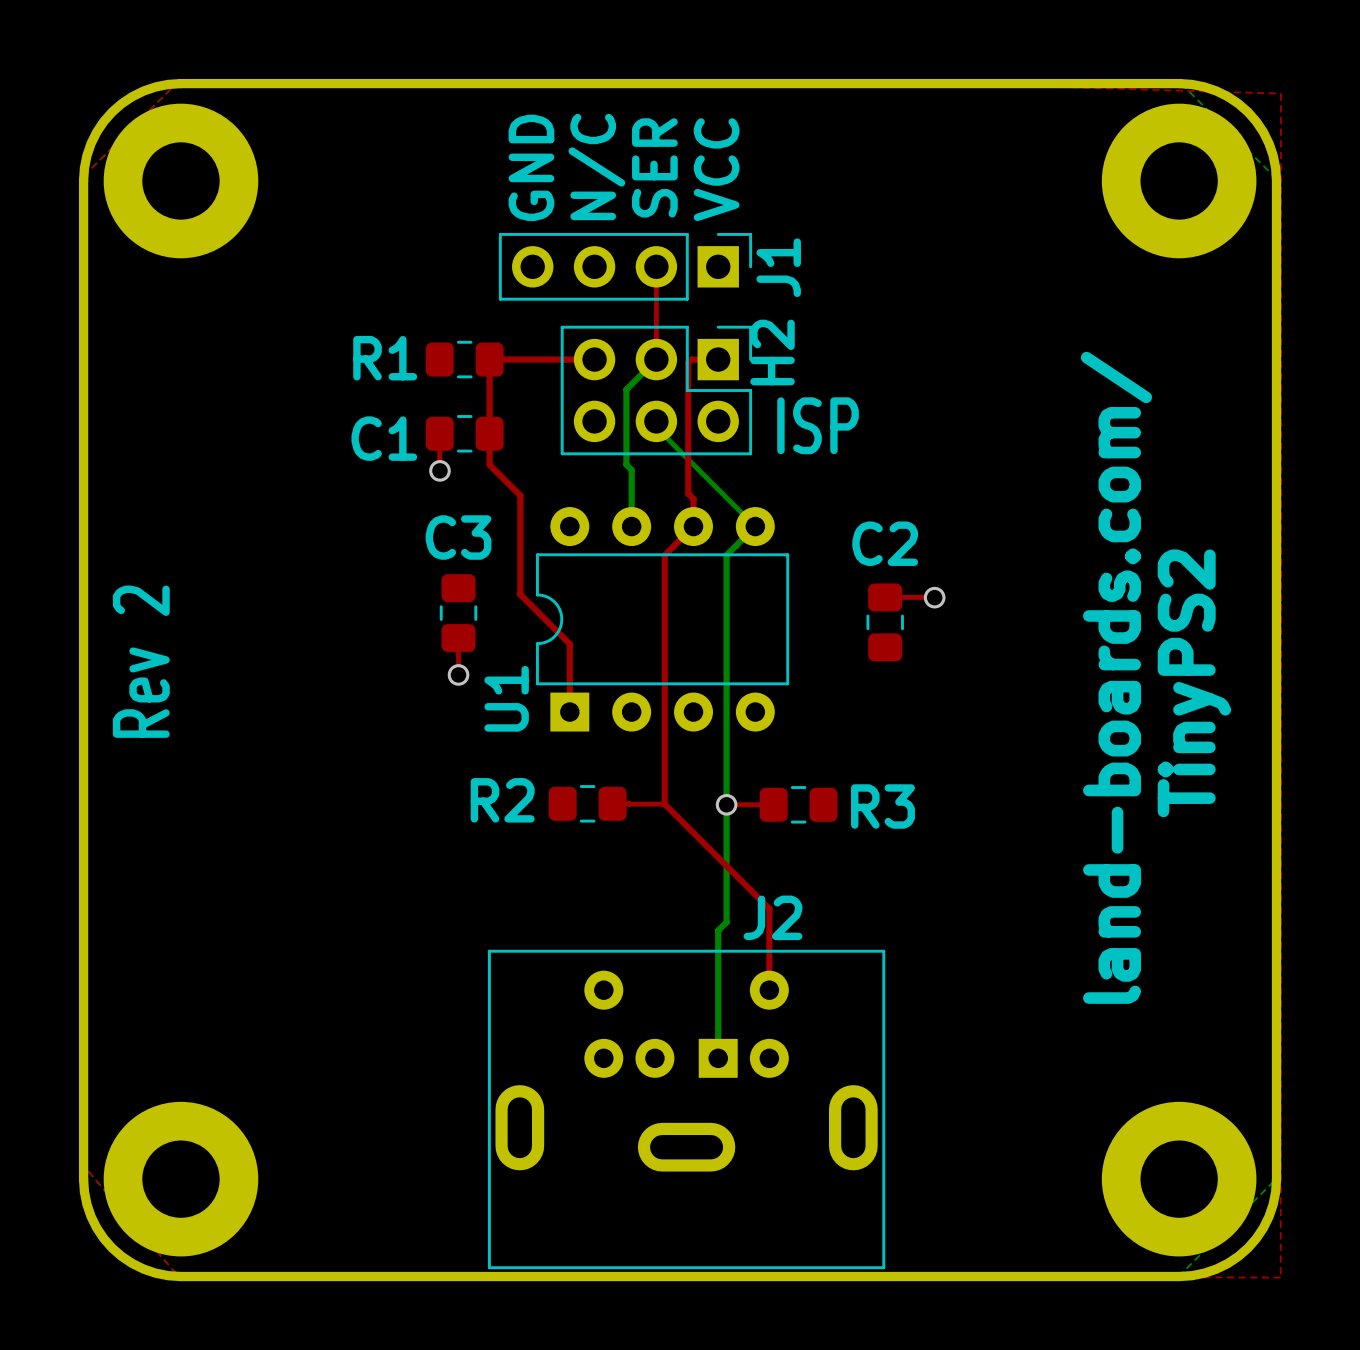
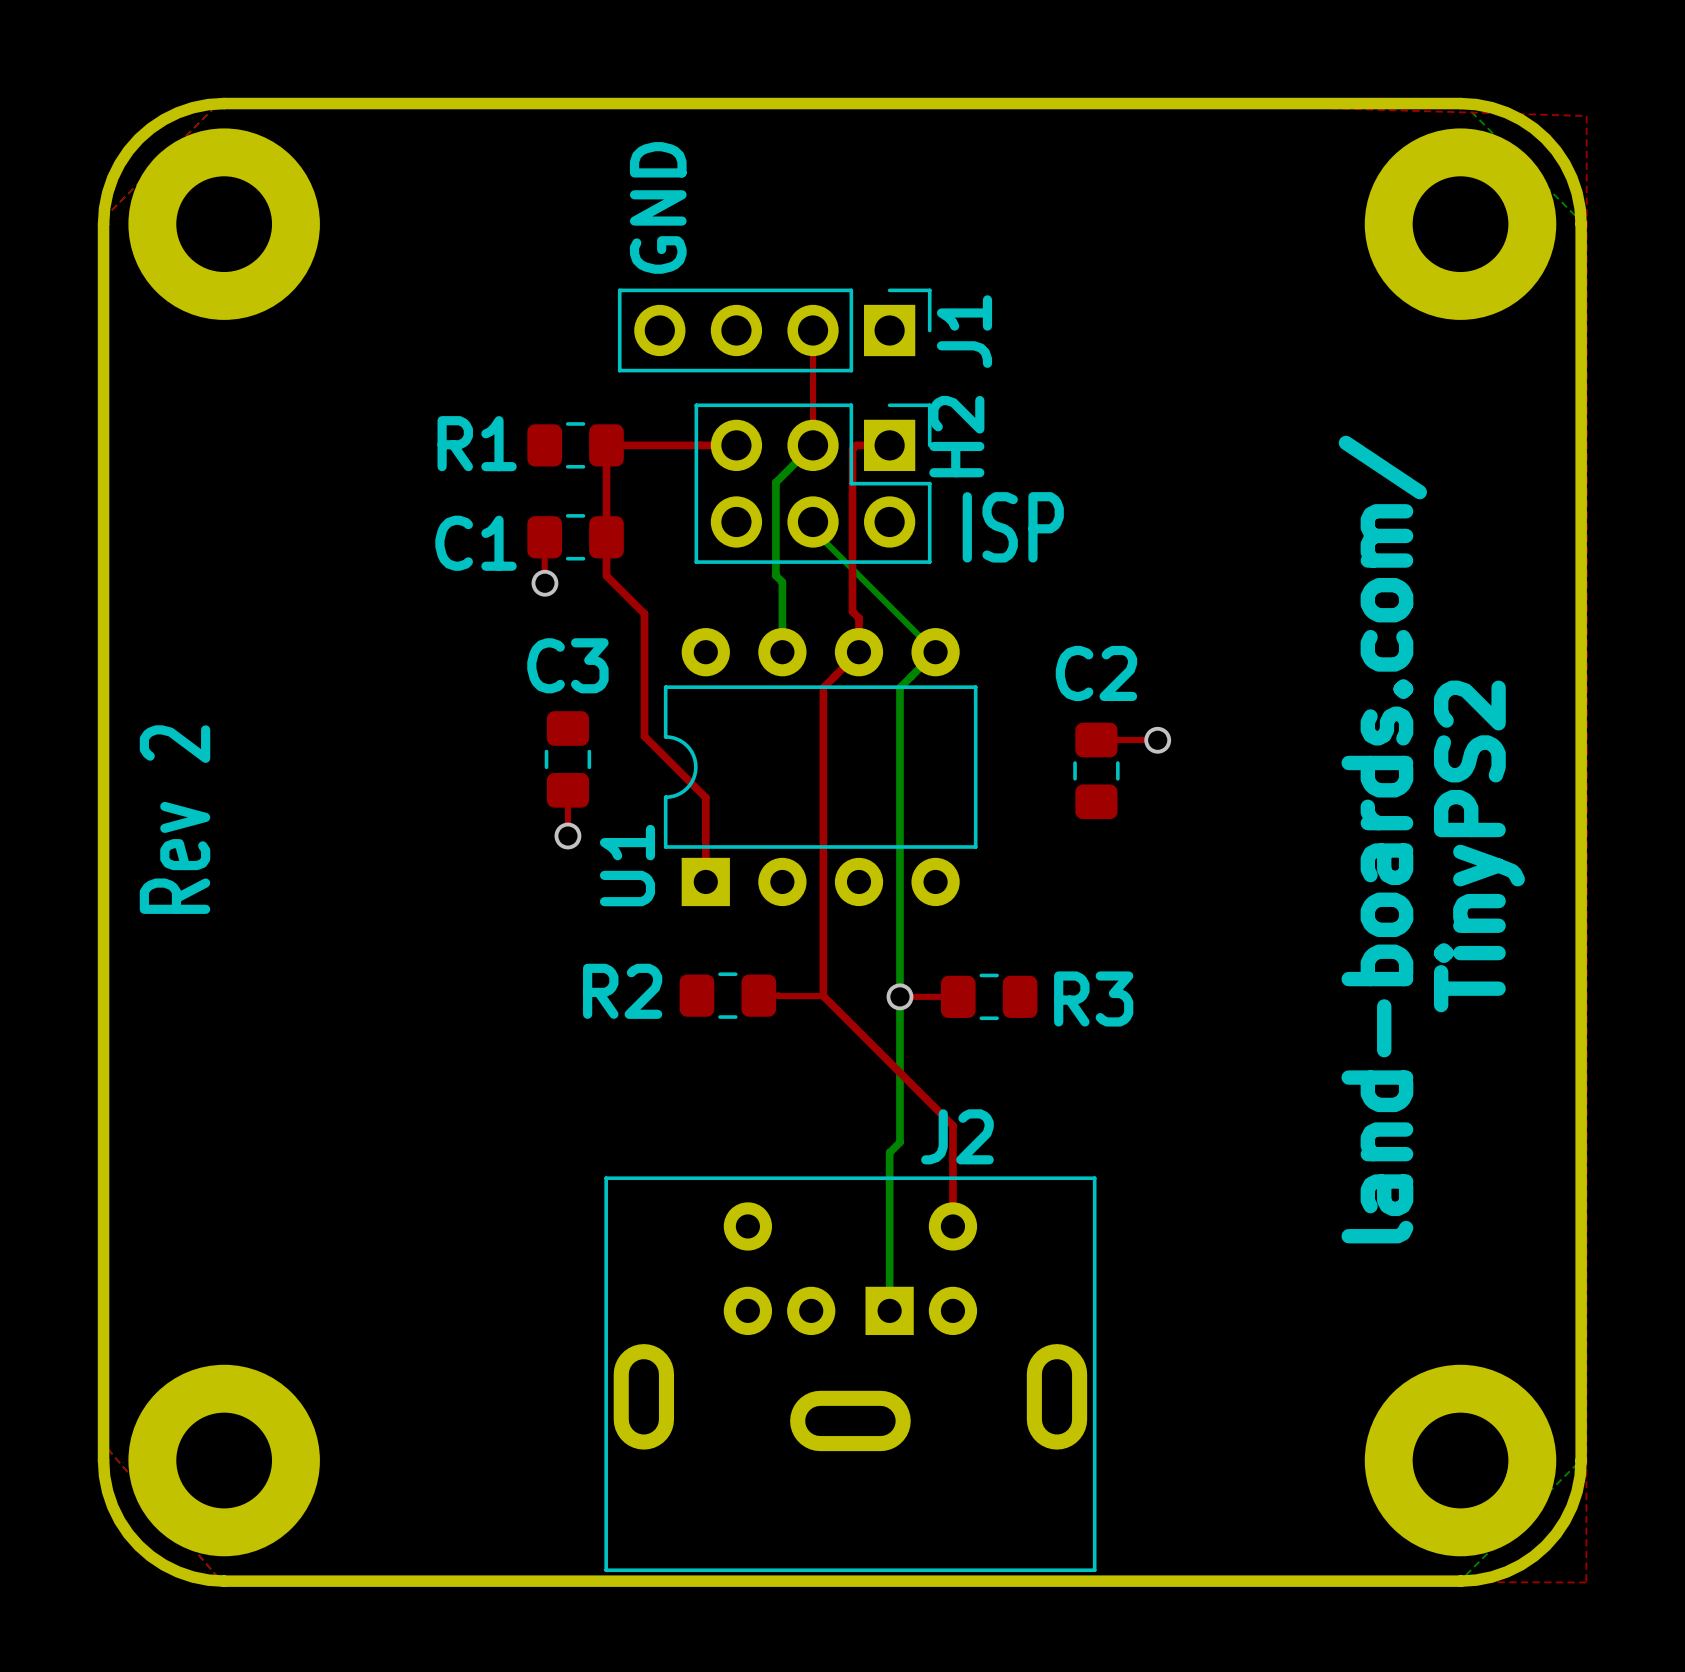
text: N/C (596, 166) -> none
text: SER (654, 167) -> none
text: VCC (716, 169) -> none

